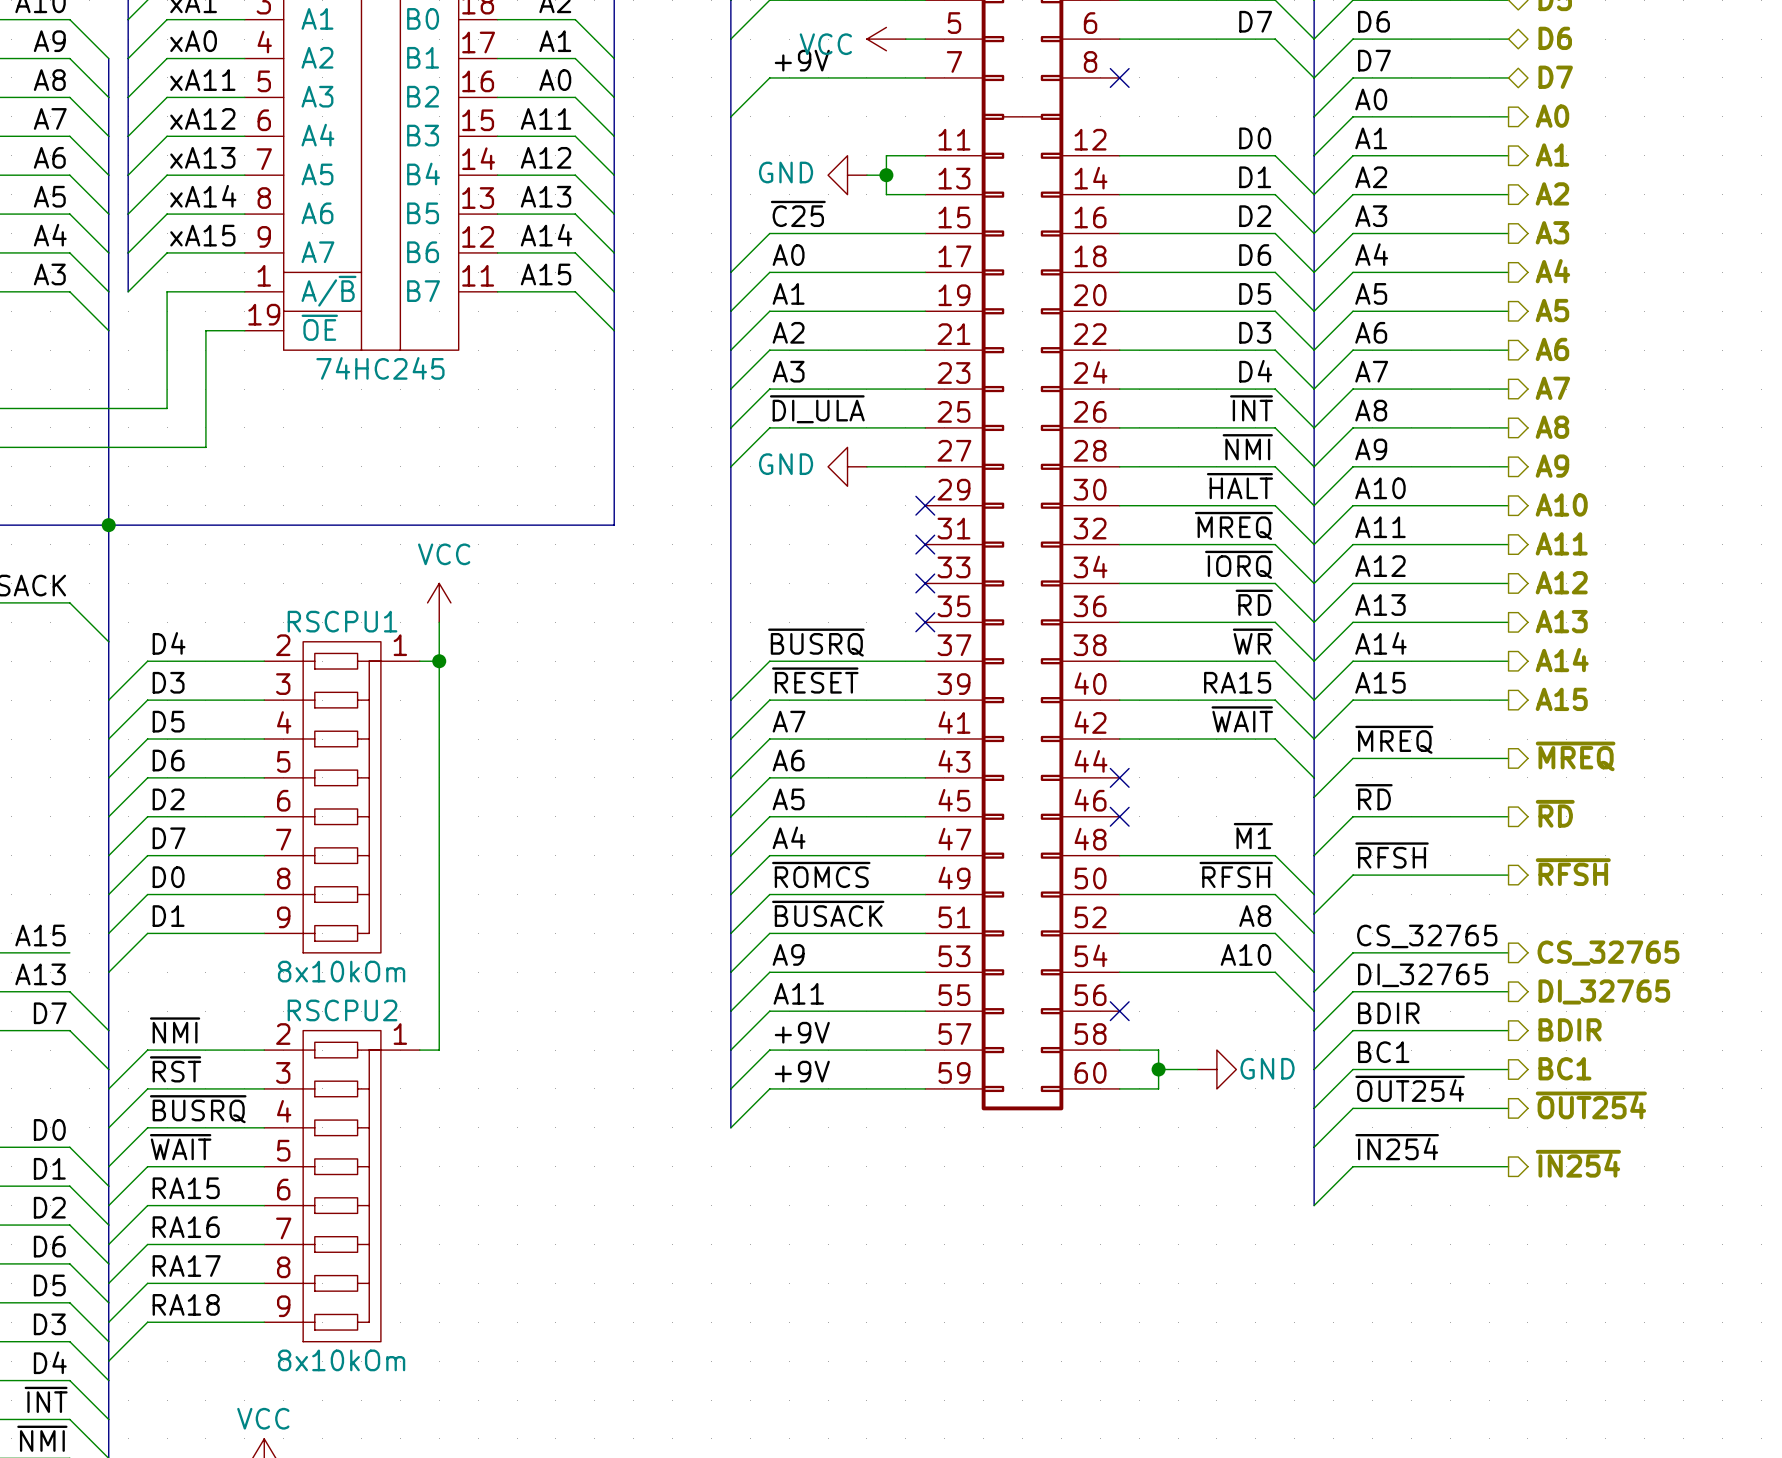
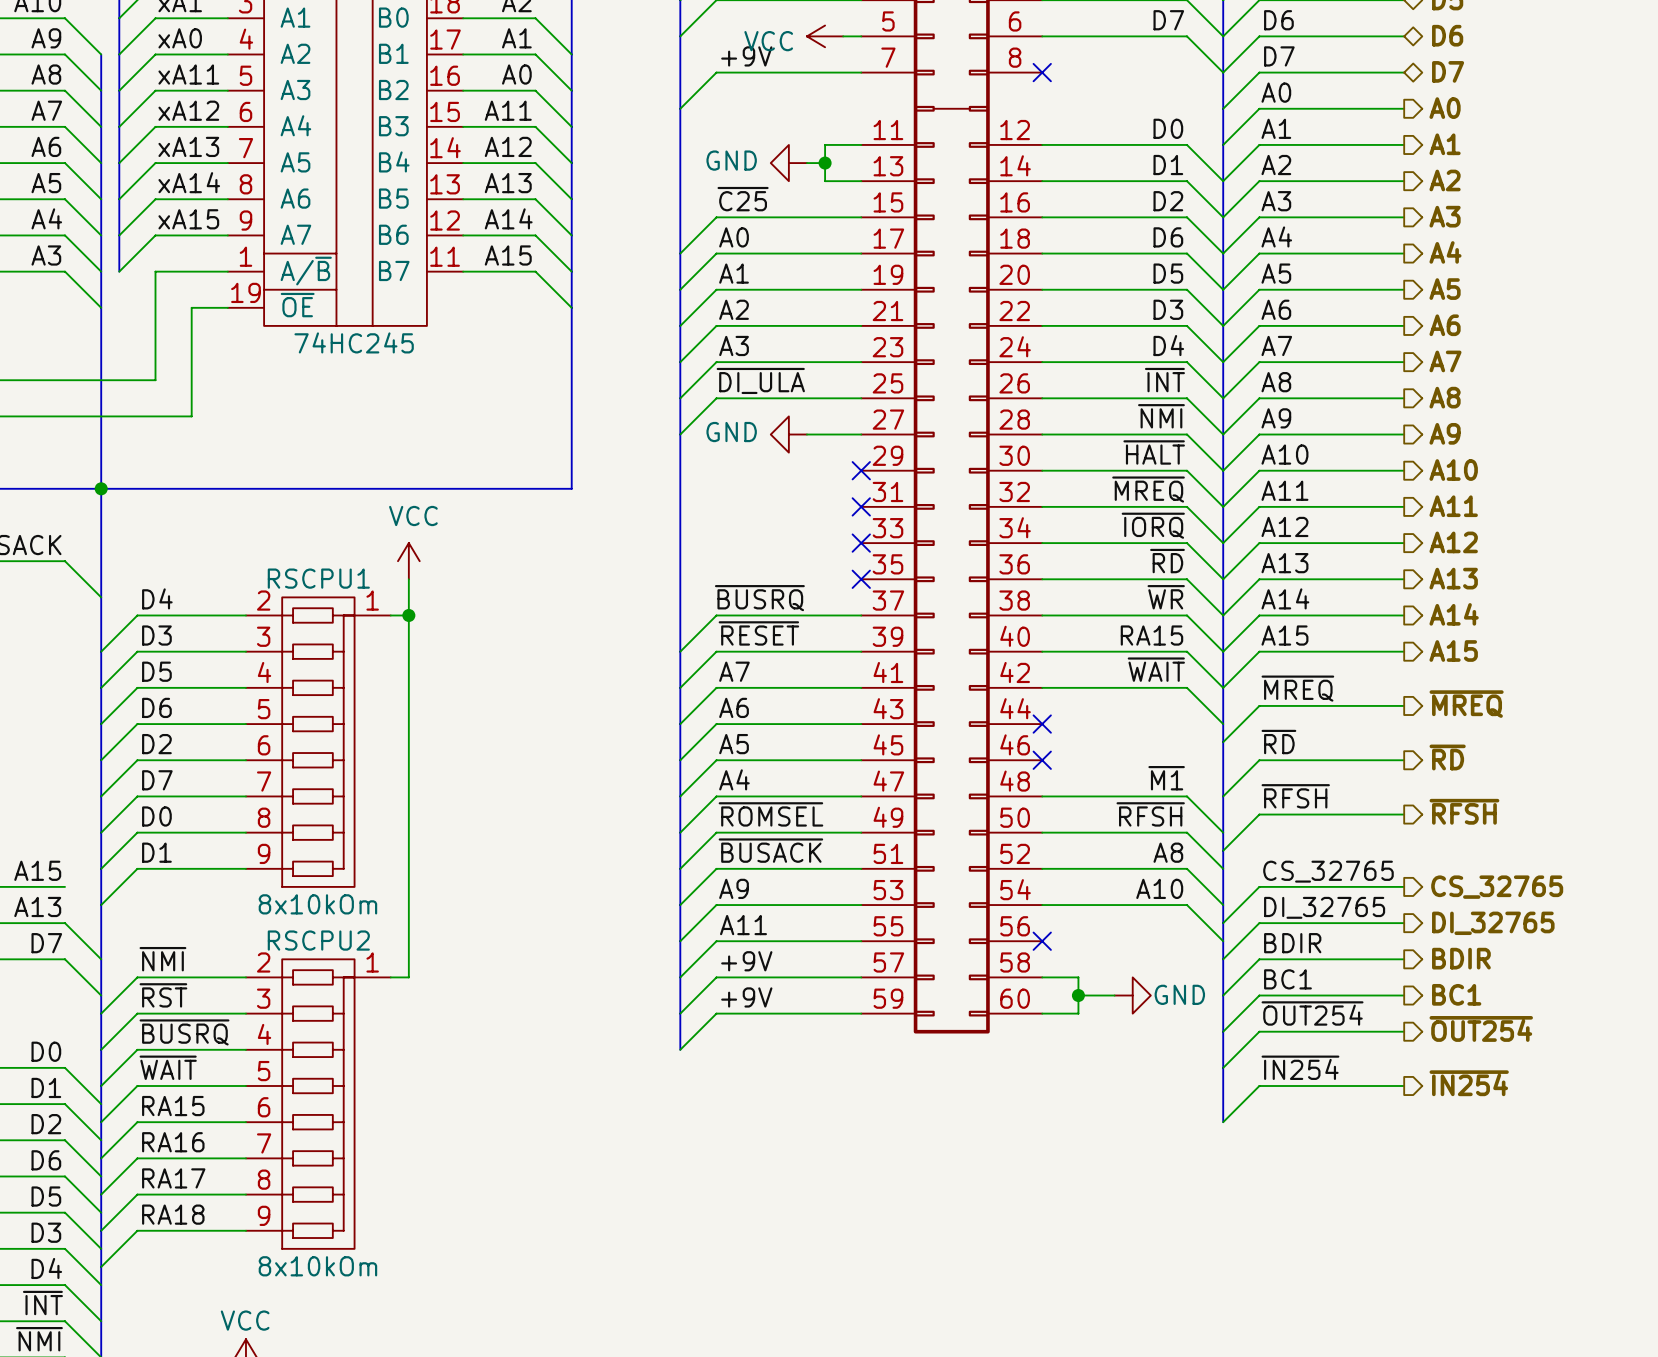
label: ~{ROMCS} (821, 874) -> ~{ROMSEL} (770, 814)

